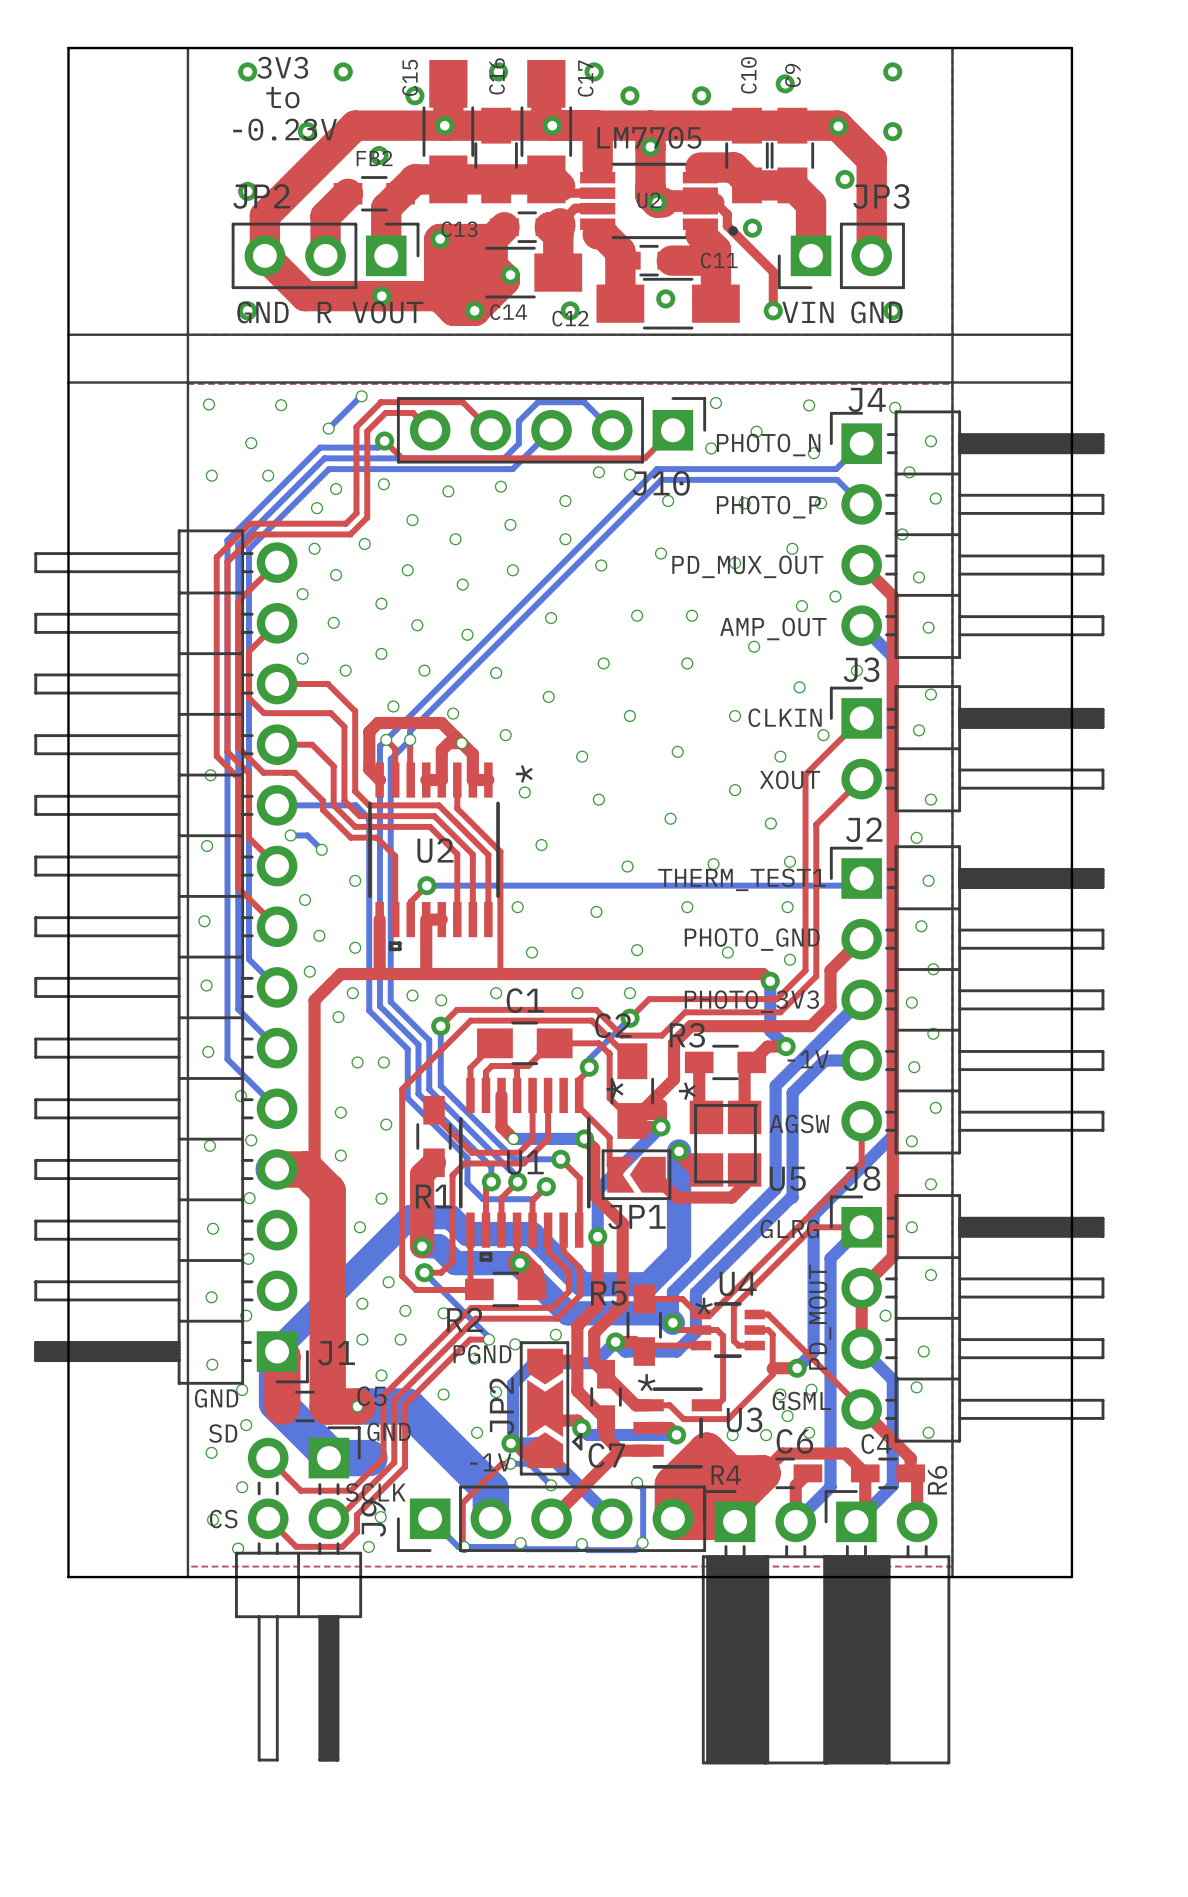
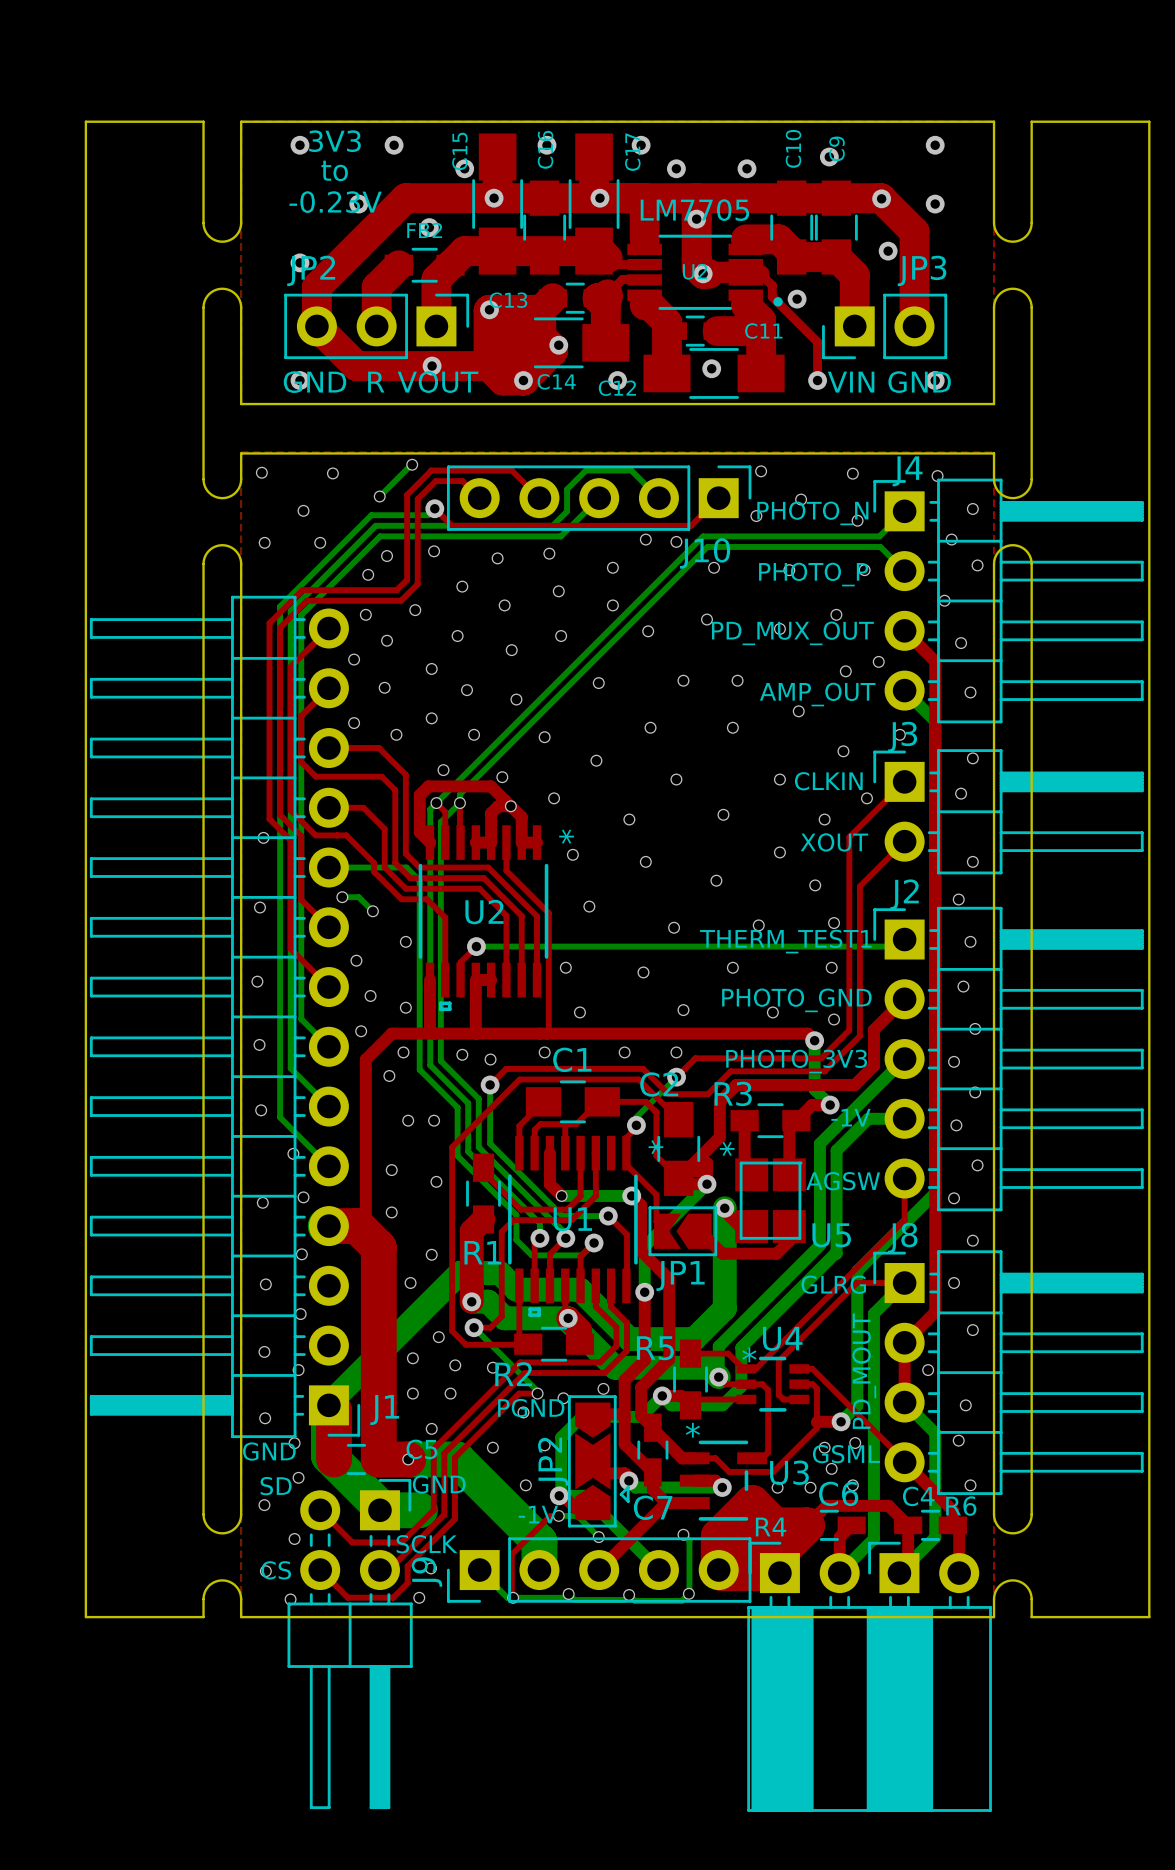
board edge: (68, 48) (68, 1577) (1071, 1577) (1071, 48) -> (123, 121) (85, 121) (85, 1617) (203, 1617) (203, 1596) (206, 1589) (212, 1582) (222, 1580) (231, 1582) (238, 1589) (241, 1596) (241, 1617) (994, 1617) (994, 1596) (996, 1589) (1003, 1582) (1012, 1580) (1022, 1582) (1029, 1589) (1031, 1596) (1031, 1617) (1149, 1617) (1149, 121) (1111, 121)
board edge: (149, 48) (187, 48) -> (203, 121) (203, 225) (209, 236) (222, 241) (235, 236) (241, 225) (241, 121)
line: (187, 48) (187, 1577) -> none
line: (952, 48) (952, 1577) -> none
board edge: (952, 48) (990, 48) -> (994, 121) (994, 225) (1001, 237) (1012, 241) (1024, 237) (1031, 225) (1031, 121)
board edge: none -> (203, 307) (203, 481) (209, 492) (217, 497) (229, 496) (238, 488) (241, 481) (241, 453) (994, 453) (994, 481) (1001, 494) (1010, 497) (1020, 496) (1027, 490) (1031, 484) (1031, 305) (1026, 294) (1017, 289) (1003, 291) (994, 302) (994, 404) (241, 404) (239, 300) (231, 291) (217, 289) (207, 296) (203, 307)
line: (68, 334) (1071, 334) -> none
line: (68, 382) (1071, 382) -> none
board edge: none -> (203, 564) (203, 1514) (209, 1527) (222, 1533) (235, 1527) (241, 1514) (241, 564) (235, 550) (222, 545) (209, 550) (203, 564)
board edge: none -> (994, 564) (994, 1514) (999, 1527) (1012, 1533) (1026, 1527) (1031, 1514) (1031, 564) (1026, 550) (1012, 545) (999, 550) (994, 564)
R6 name rotation: 0° (937, 1480) -> 90° clockwise (961, 1506)

